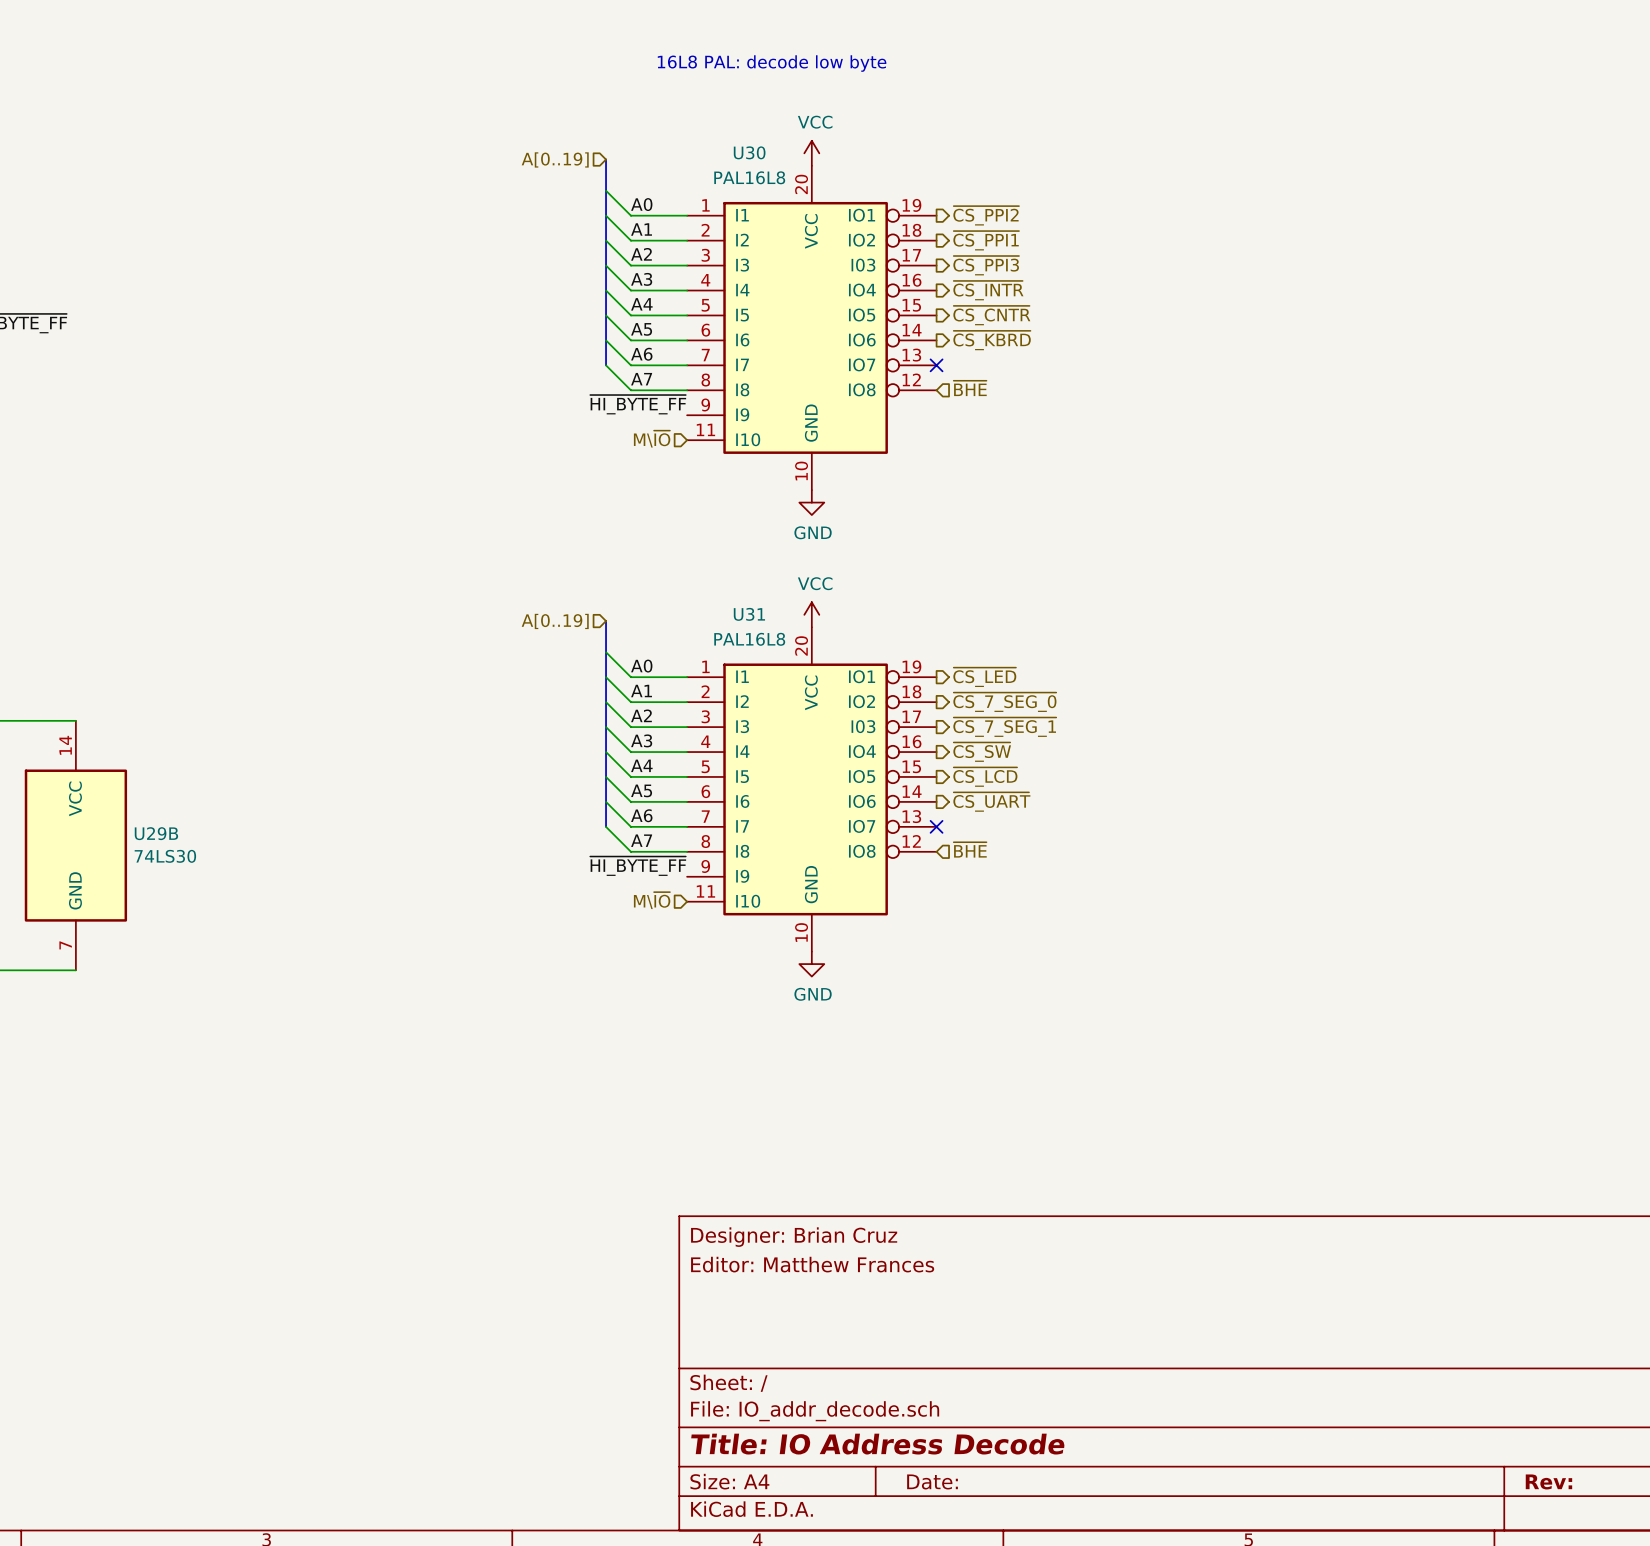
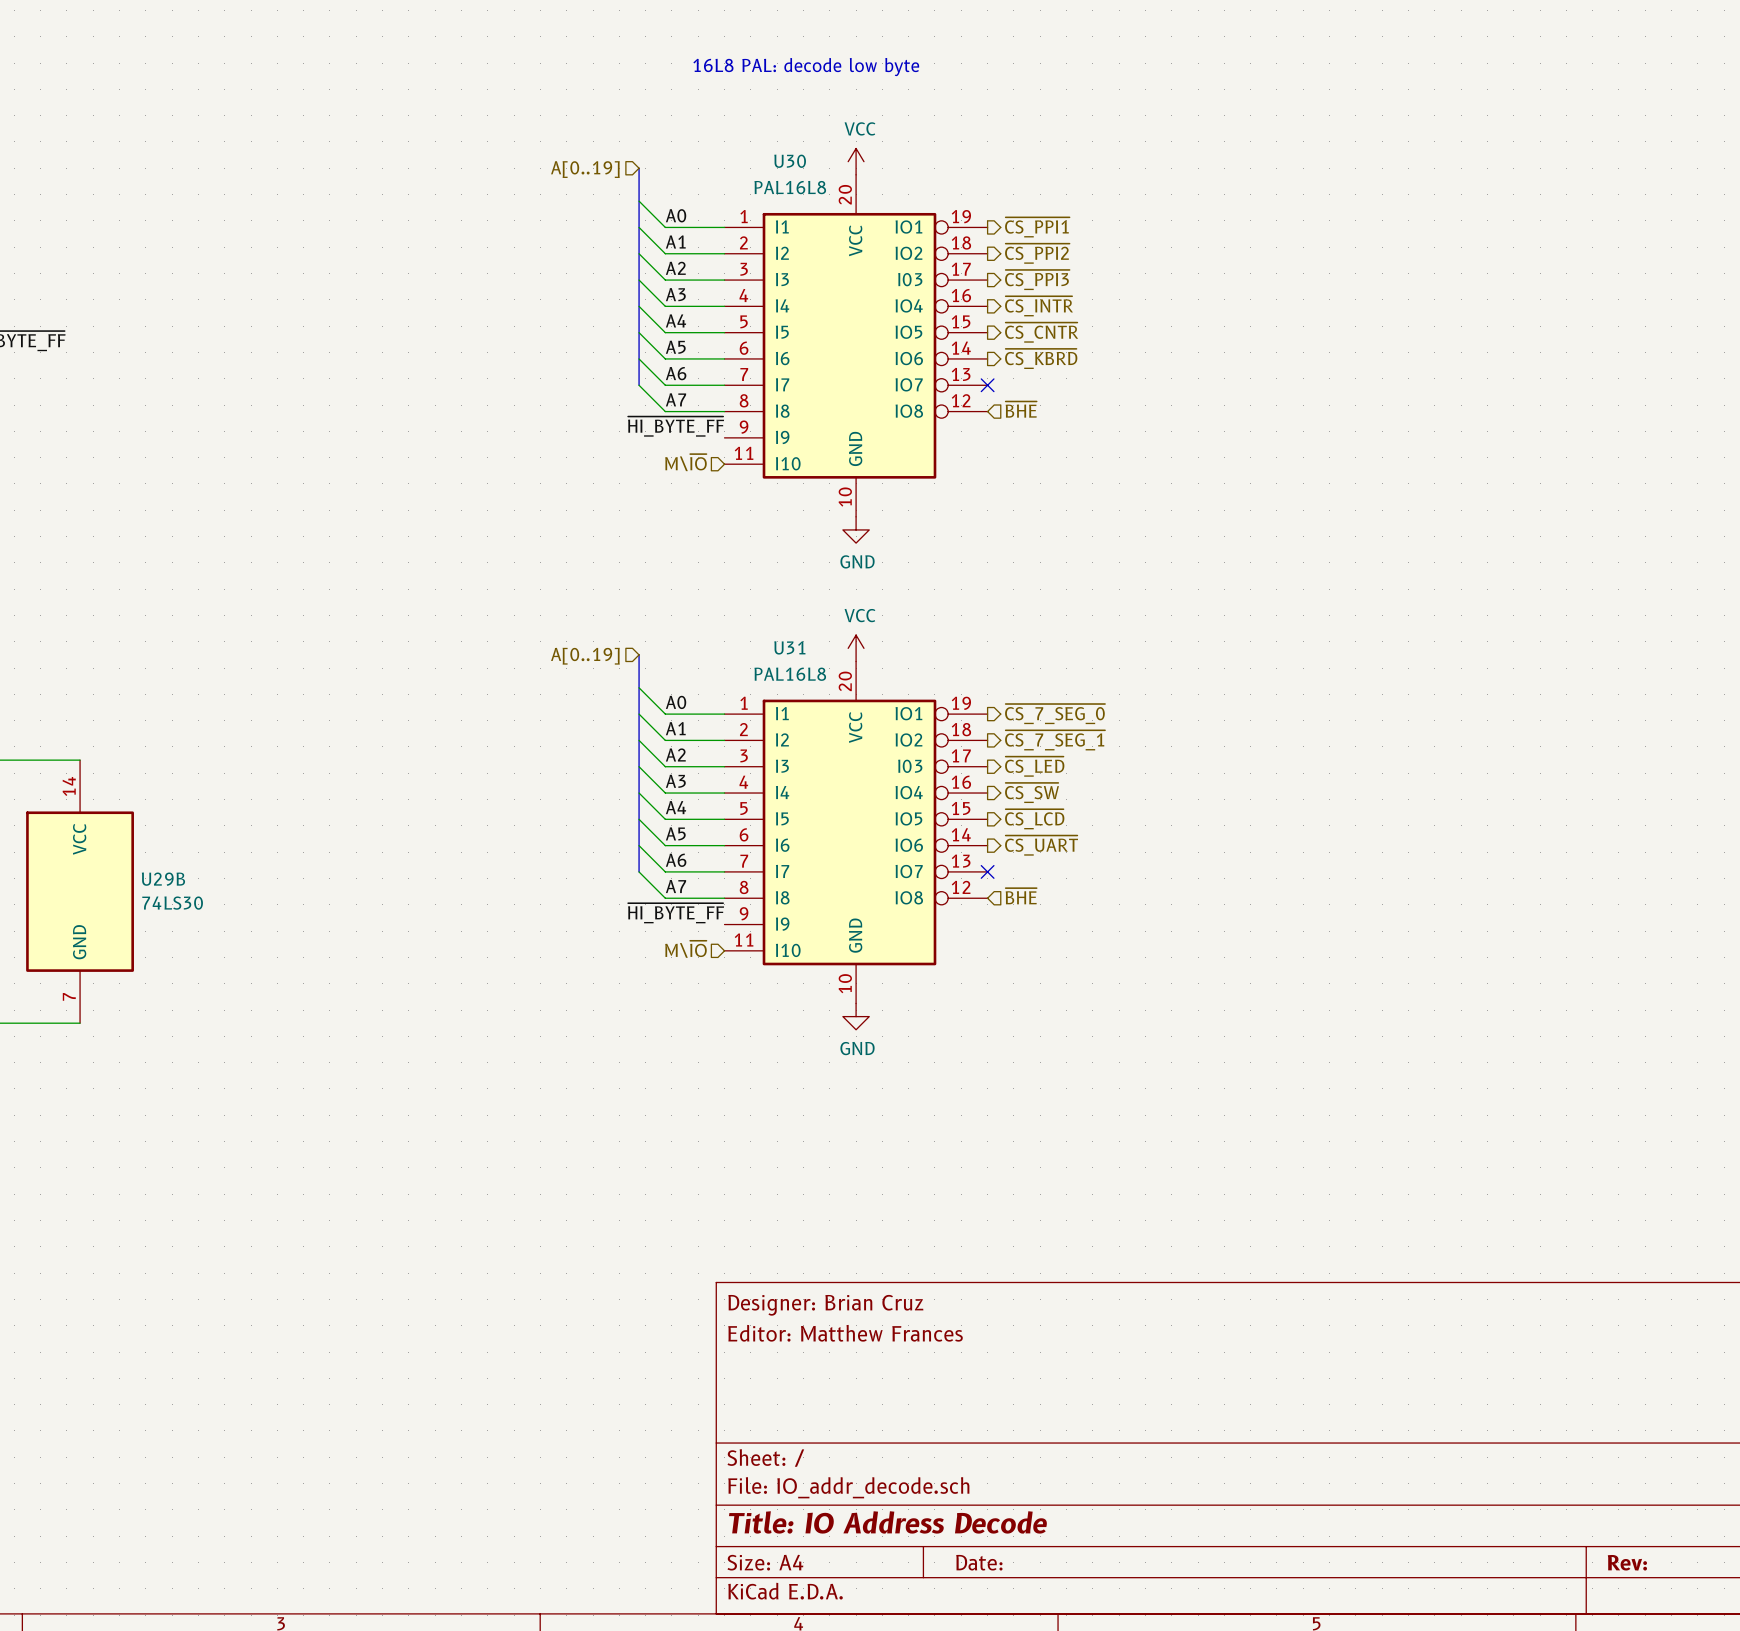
hierarchical label: ~{CS_PPI2} (986, 215) -> ~{CS_PPI1} (1037, 227)
hierarchical label: ~{CS_PPI1} (986, 240) -> ~{CS_PPI2} (1037, 253)
hierarchical label: ~{CS_LED} (984, 677) -> ~{CS_7_SEG_0} (1055, 714)
hierarchical label: ~{CS_7_SEG_0} (1004, 702) -> ~{CS_7_SEG_1} (1055, 740)
hierarchical label: ~{CS_7_SEG_1} (1004, 727) -> ~{CS_LED} (1034, 766)

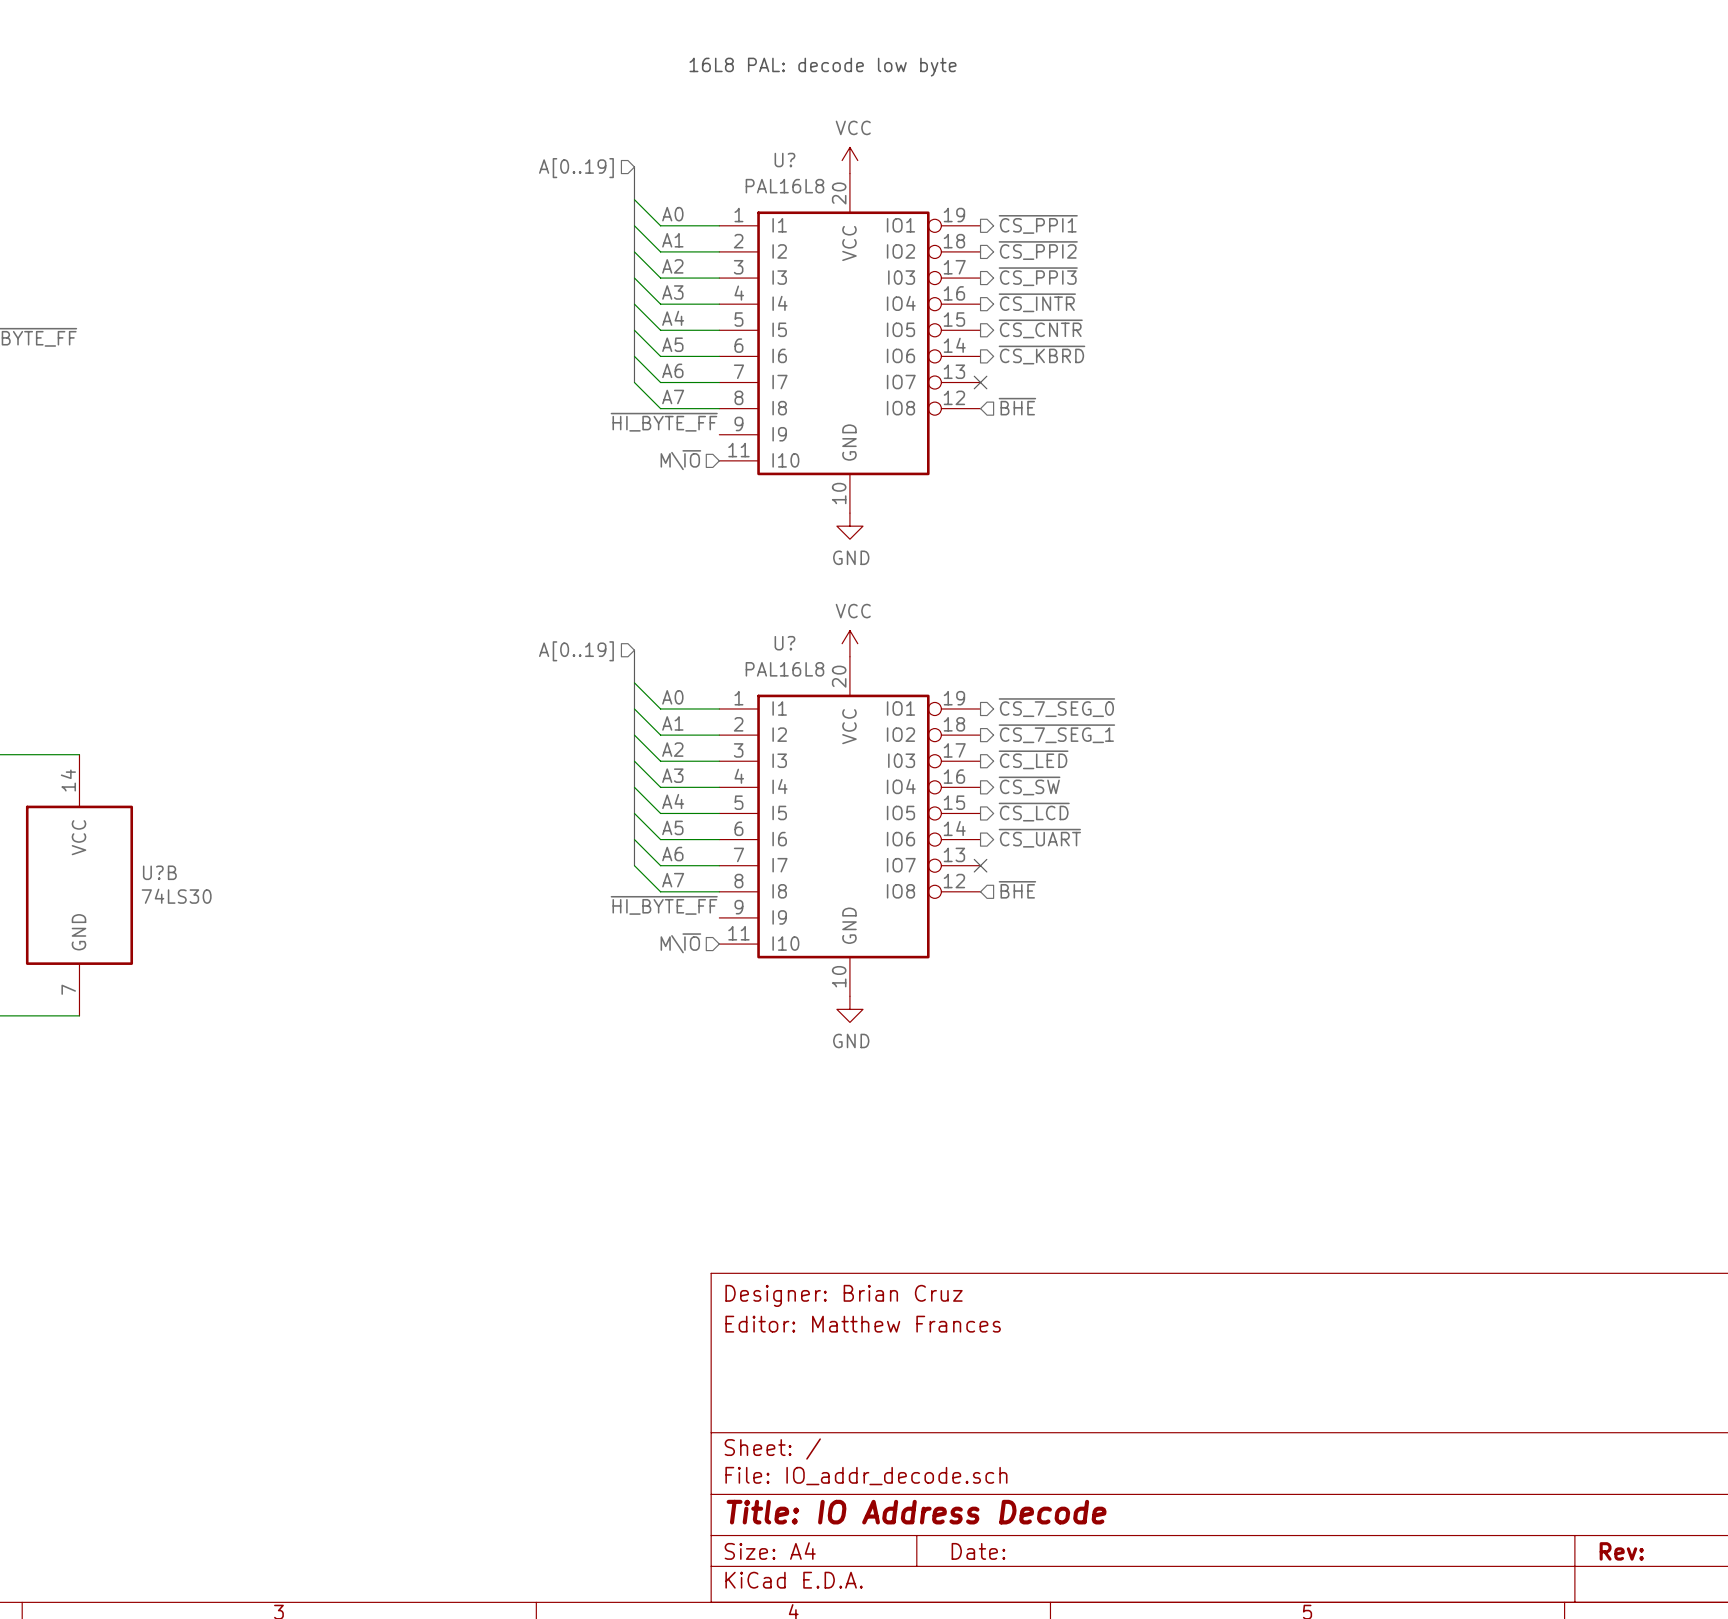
U30 name: U30 (790, 161) -> U? (784, 160)
U31 name: U31 (789, 647) -> U? (784, 643)
U29B name: U29B (163, 879) -> U?B (159, 872)

